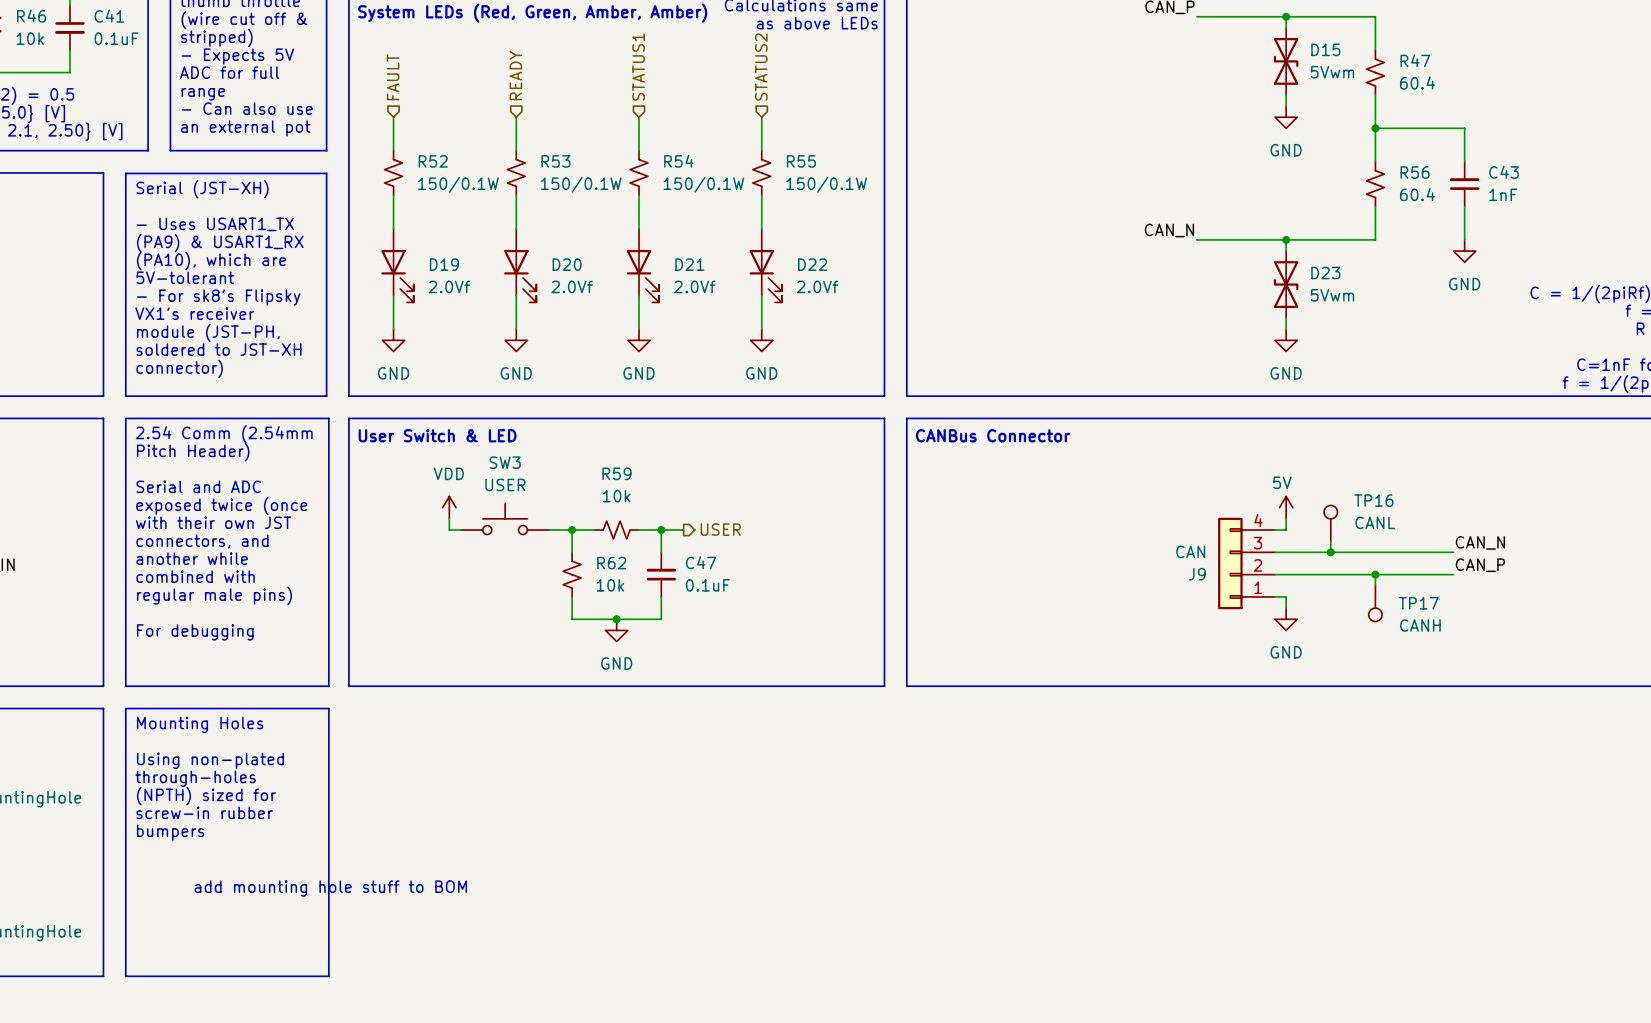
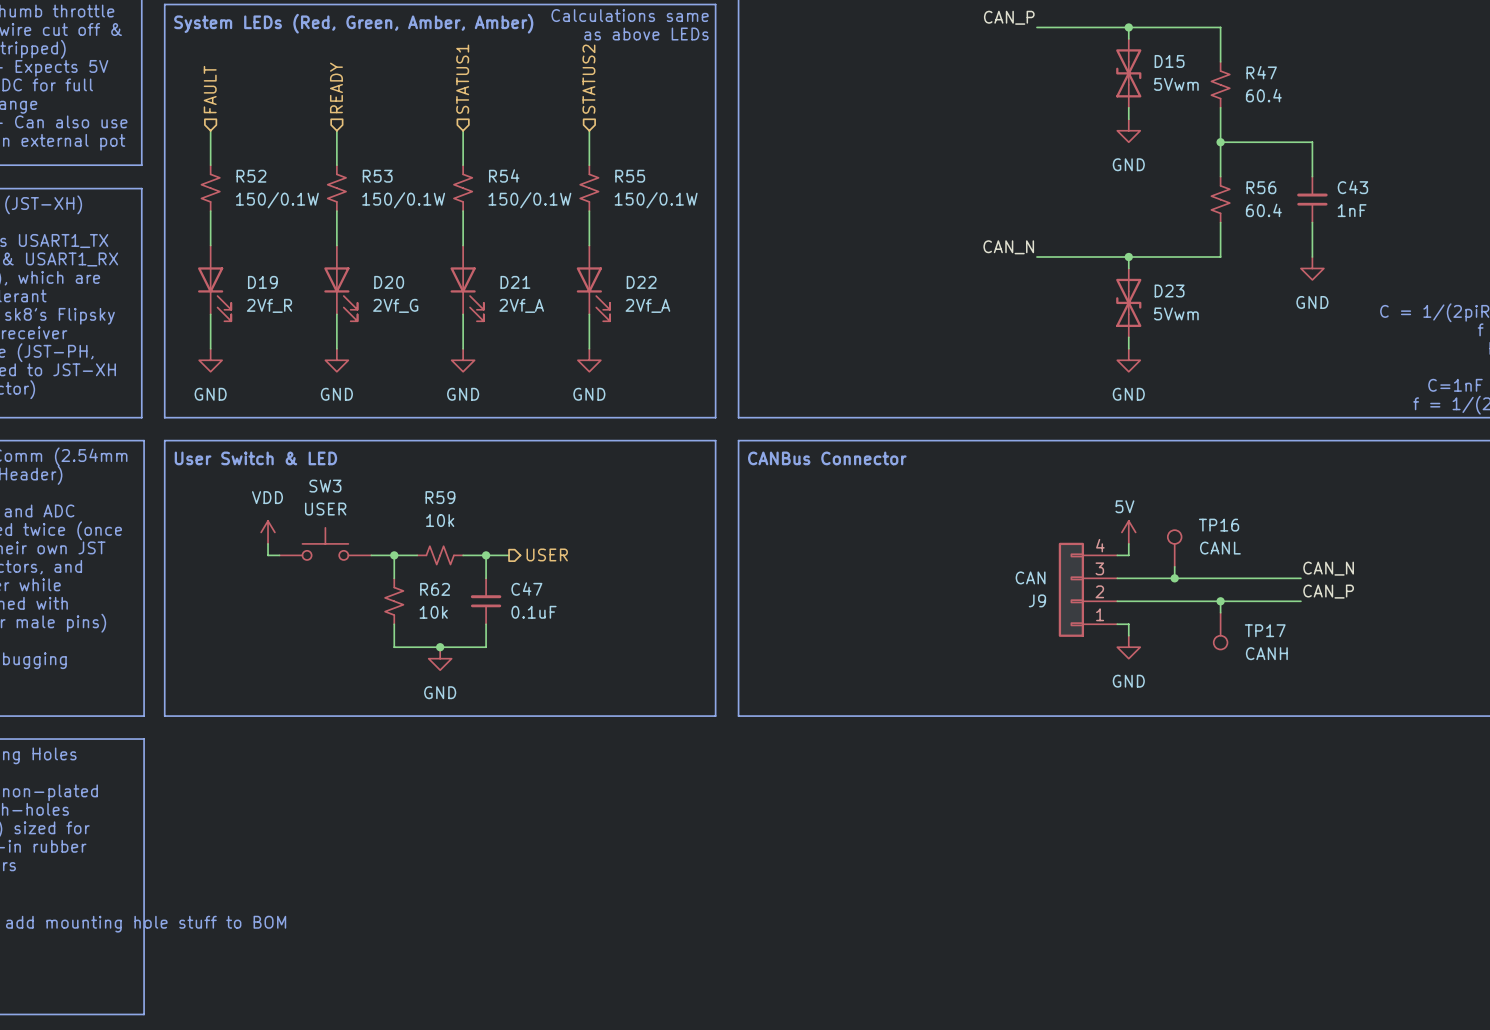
D19 value: 2.0Vf (449, 286) -> 2Vf_R (269, 305)
D20 value: 2.0Vf (572, 286) -> 2Vf_G (395, 305)
D21 value: 2.0Vf (694, 286) -> 2Vf_A (521, 305)
D22 value: 2.0Vf (817, 286) -> 2Vf_A (647, 305)

